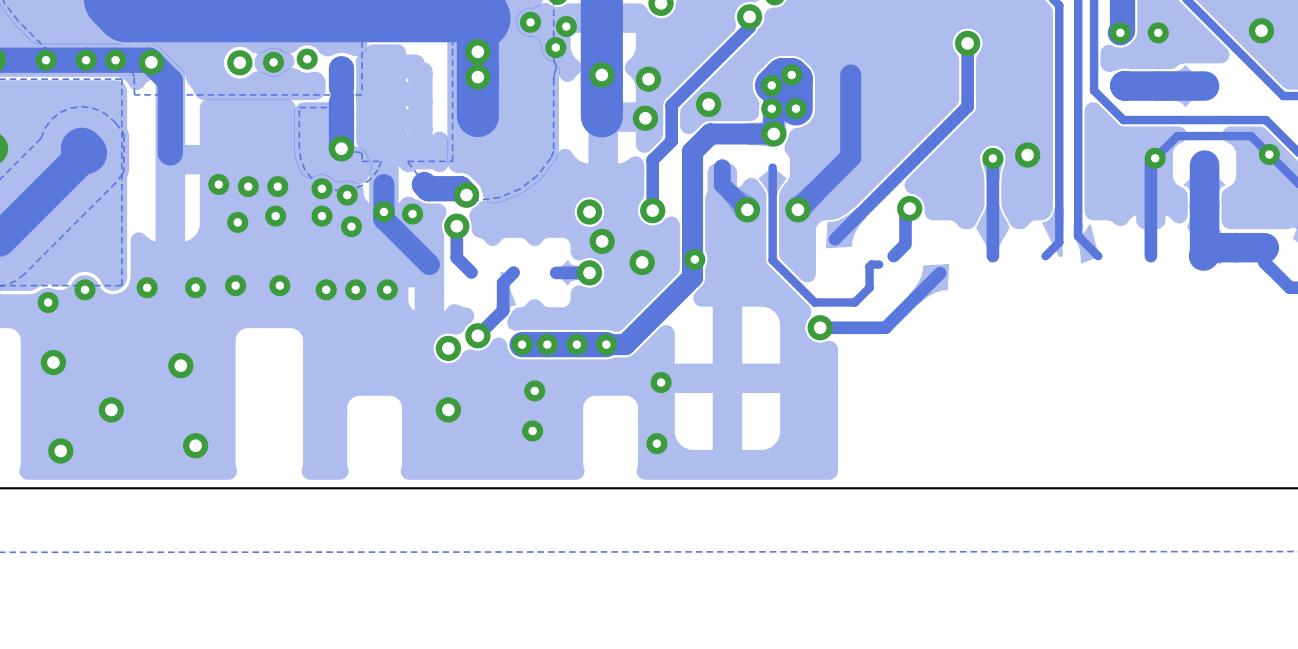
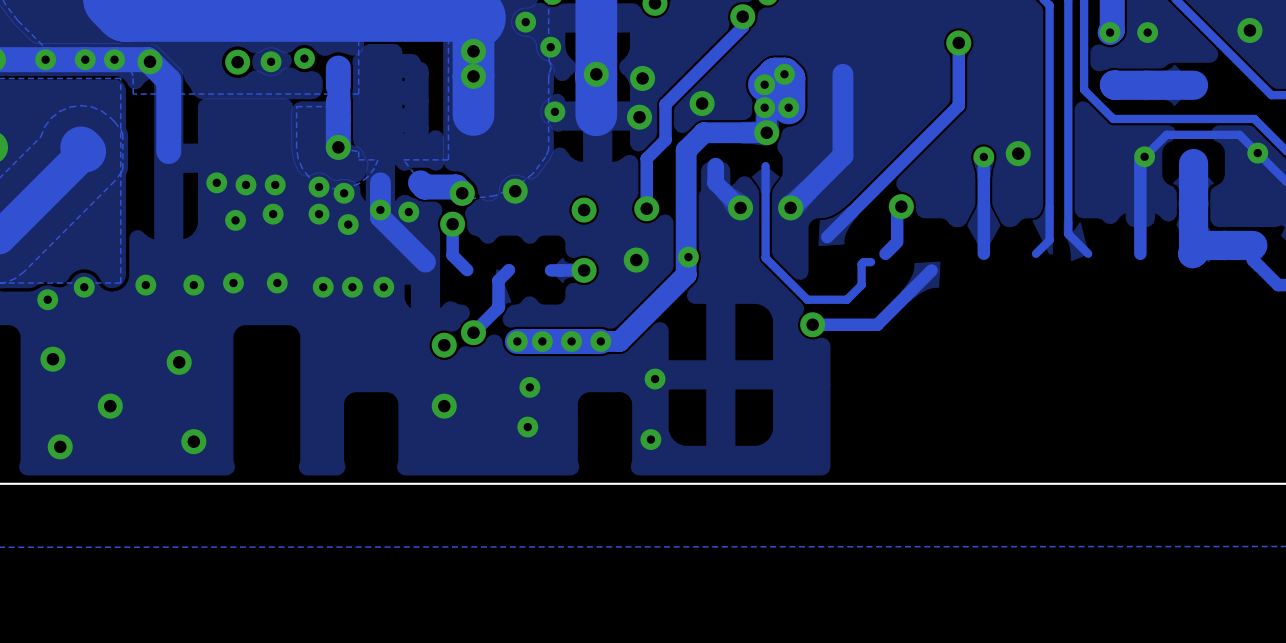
via position: (566, 26) -> (554, 111)
via position: (602, 241) -> (515, 191)

